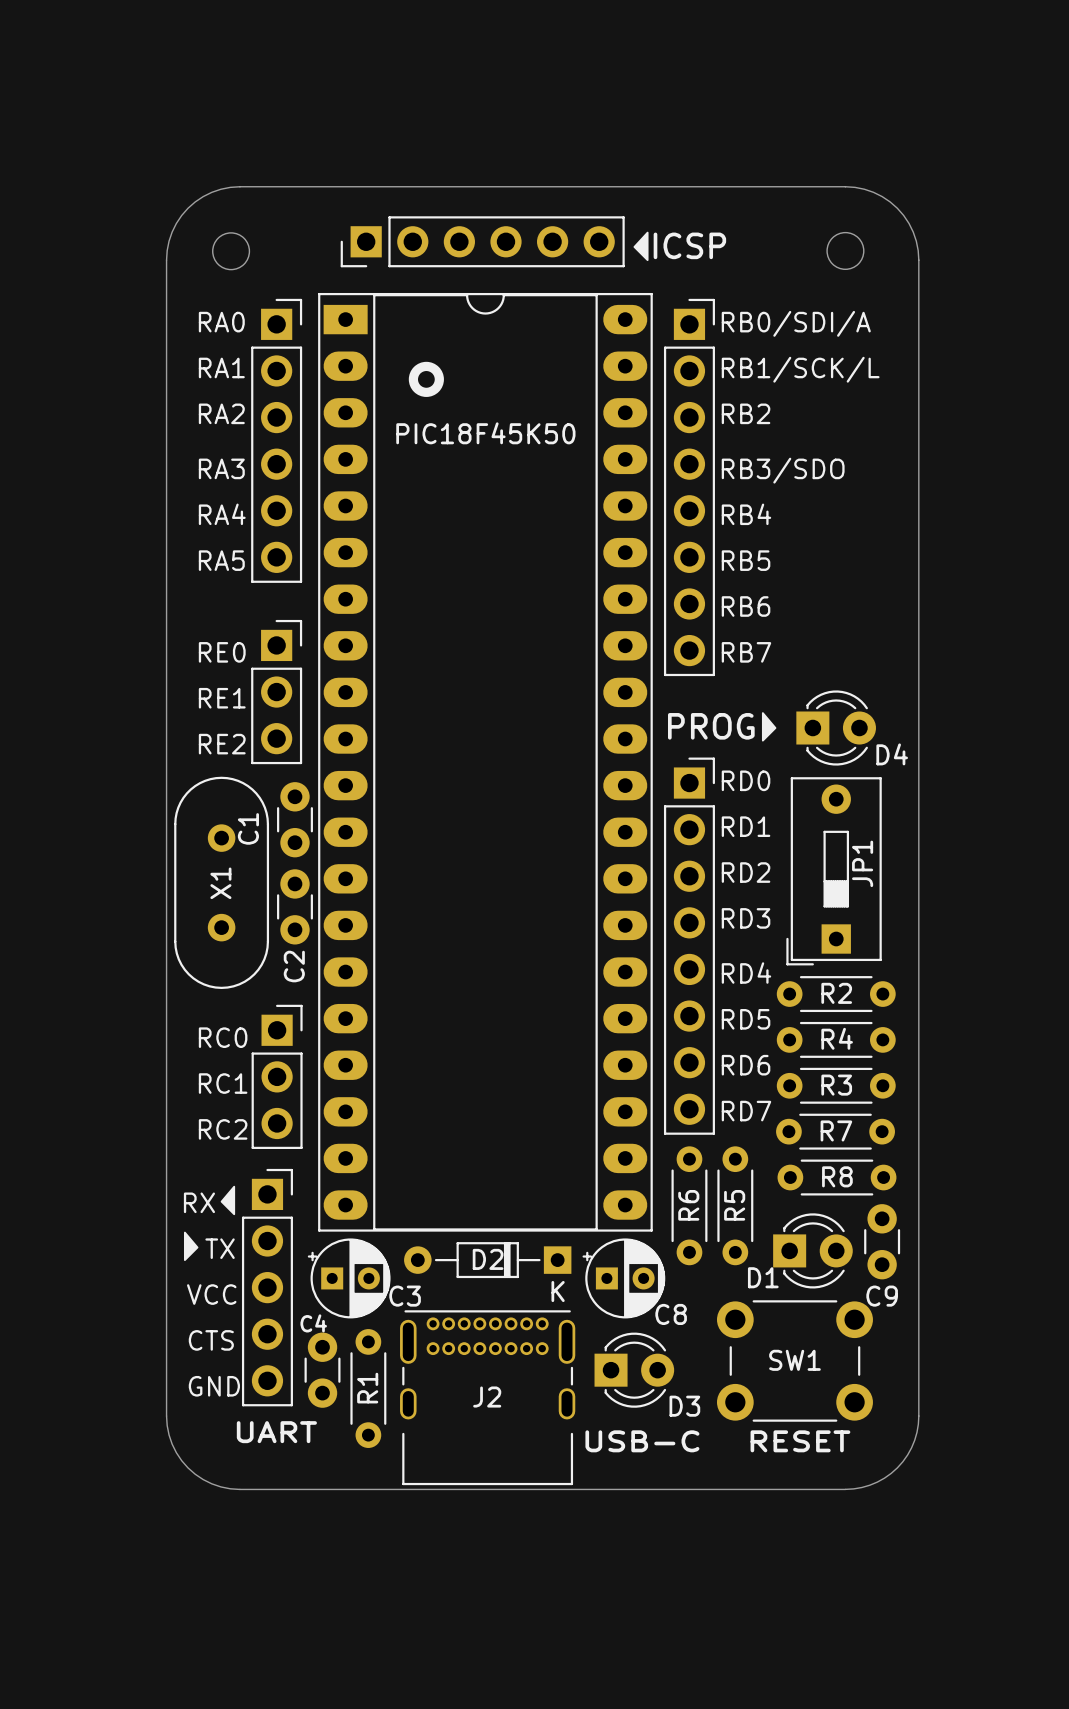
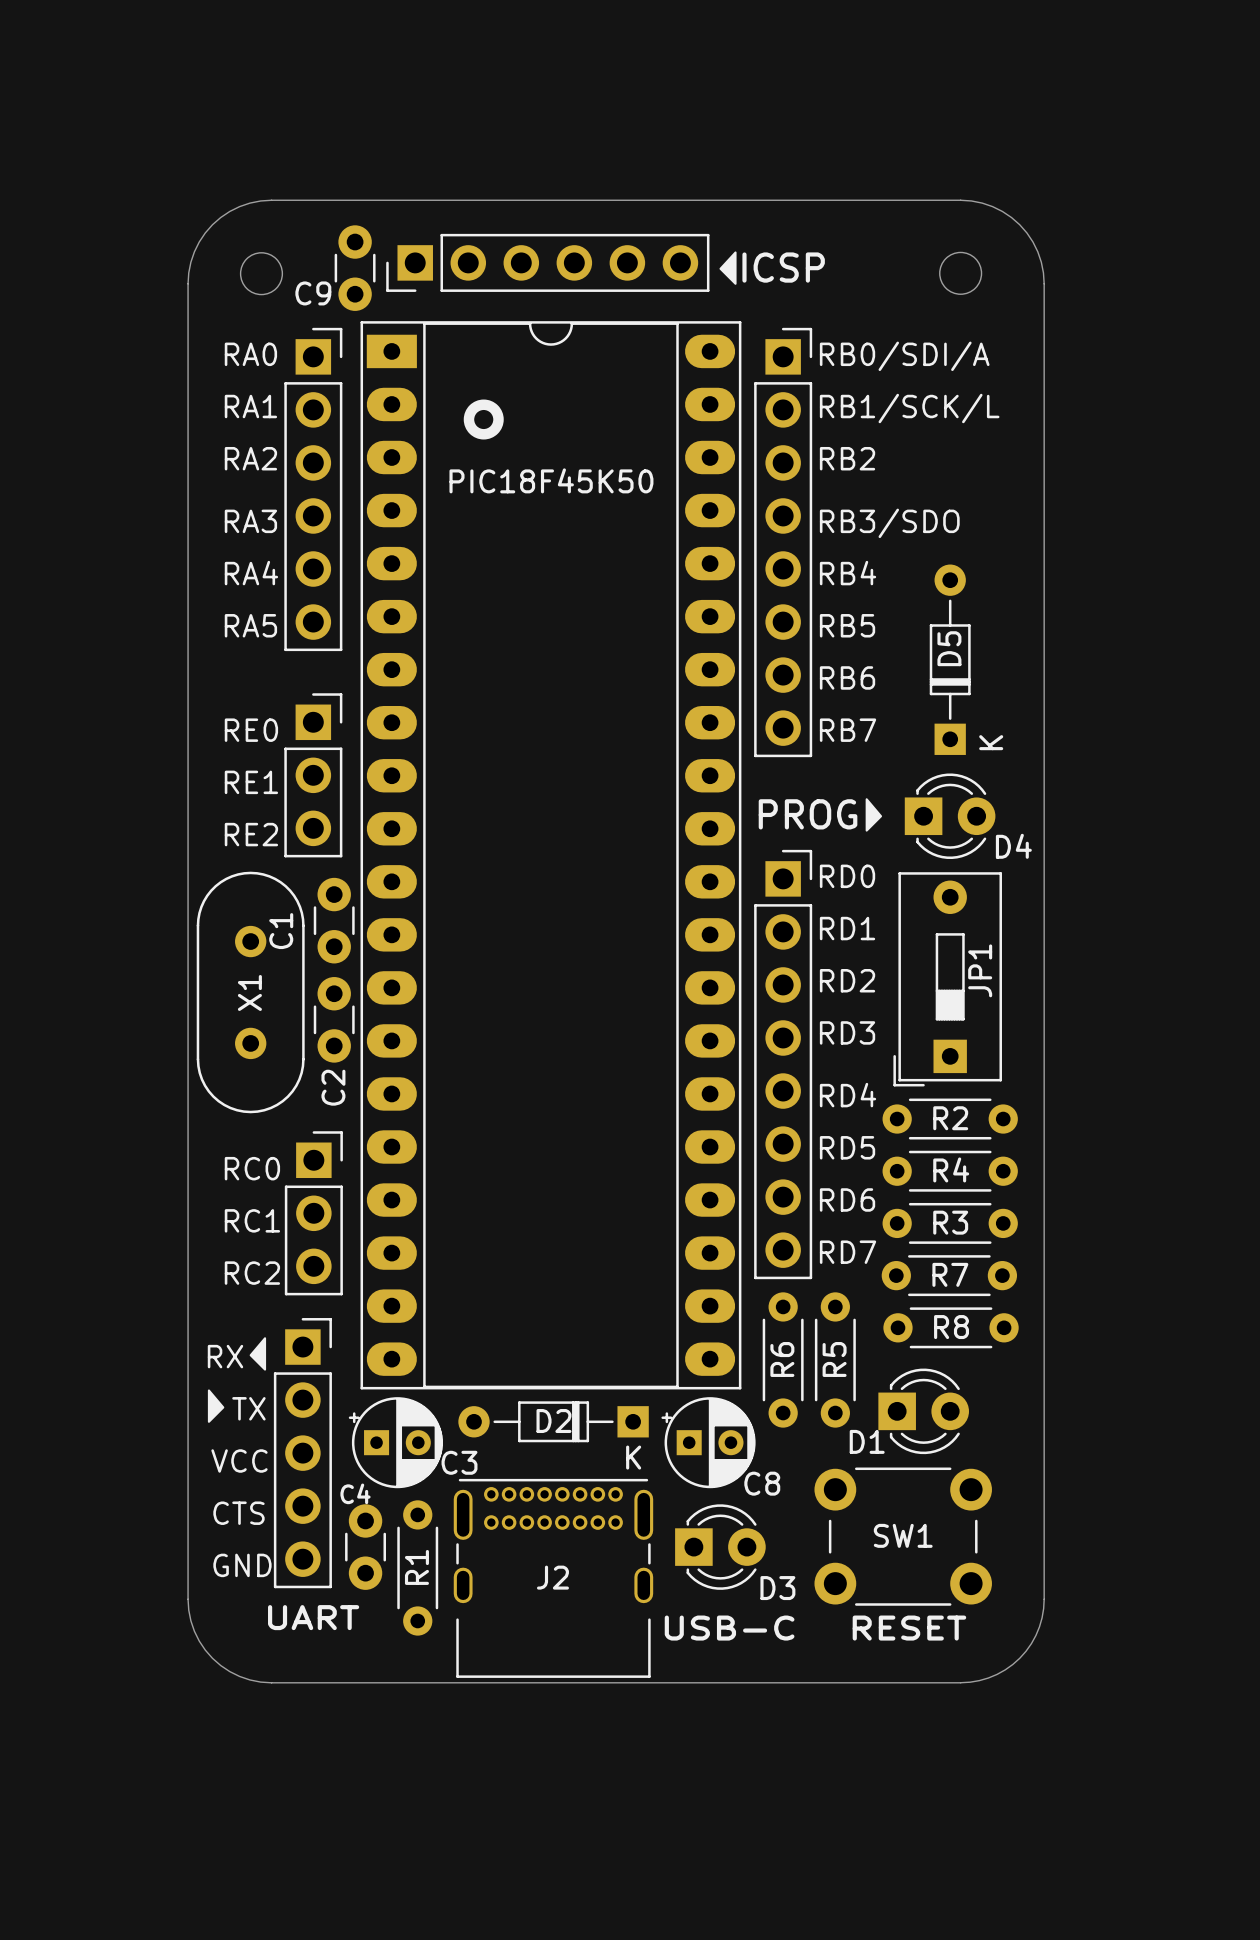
D5: none -> (950, 659)
C9 position: (882, 1241) -> (355, 268)
C9 name position: C9 (882, 1296) -> C9 (313, 293)

